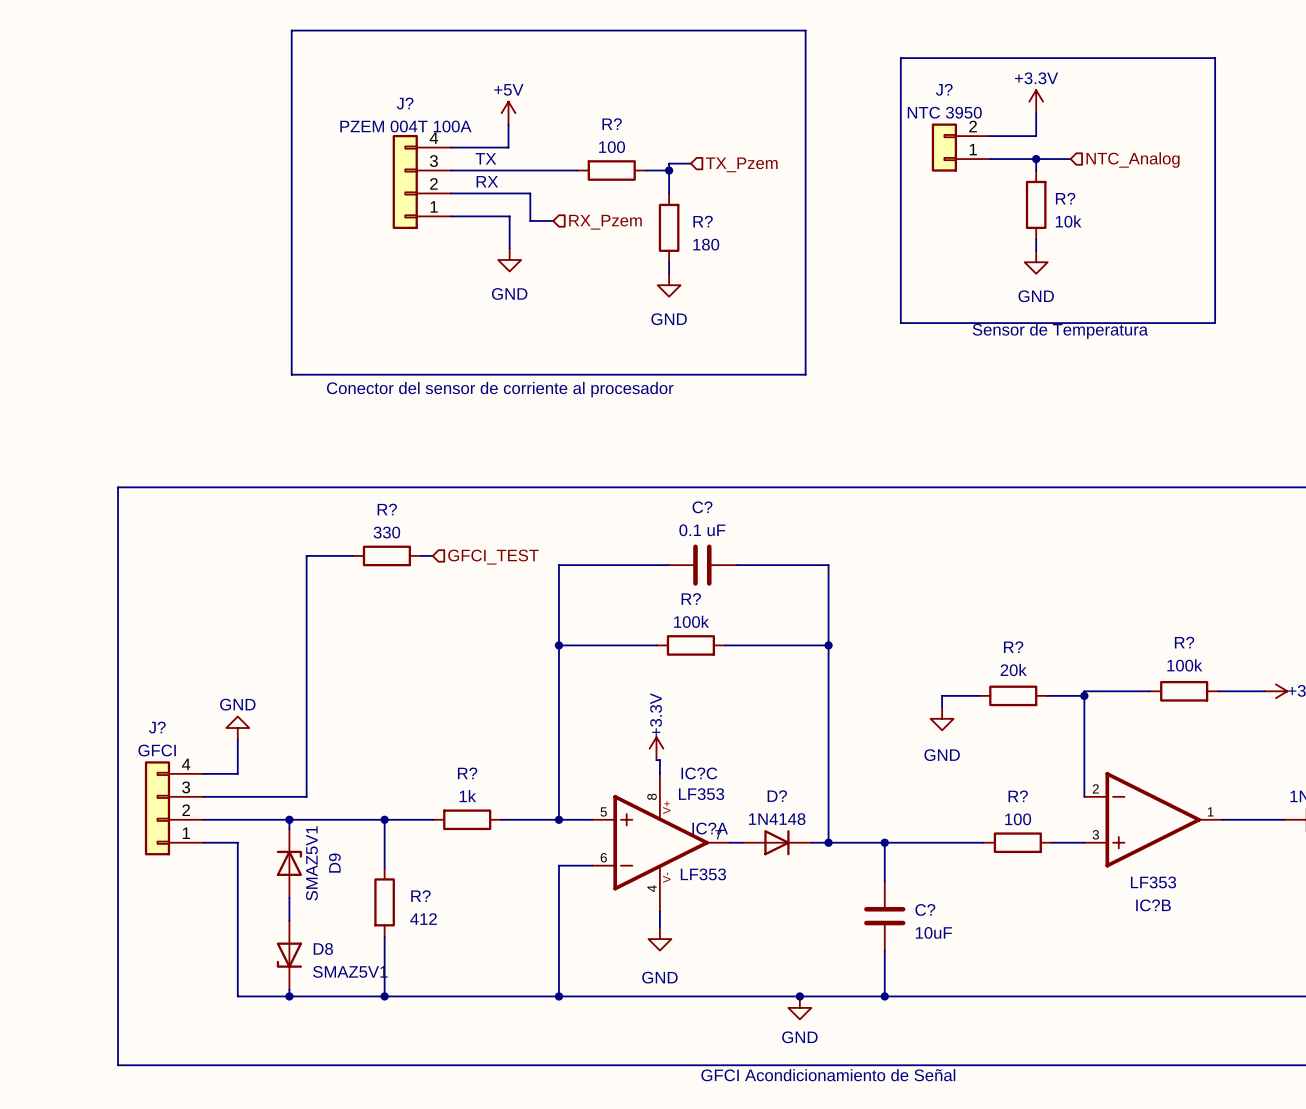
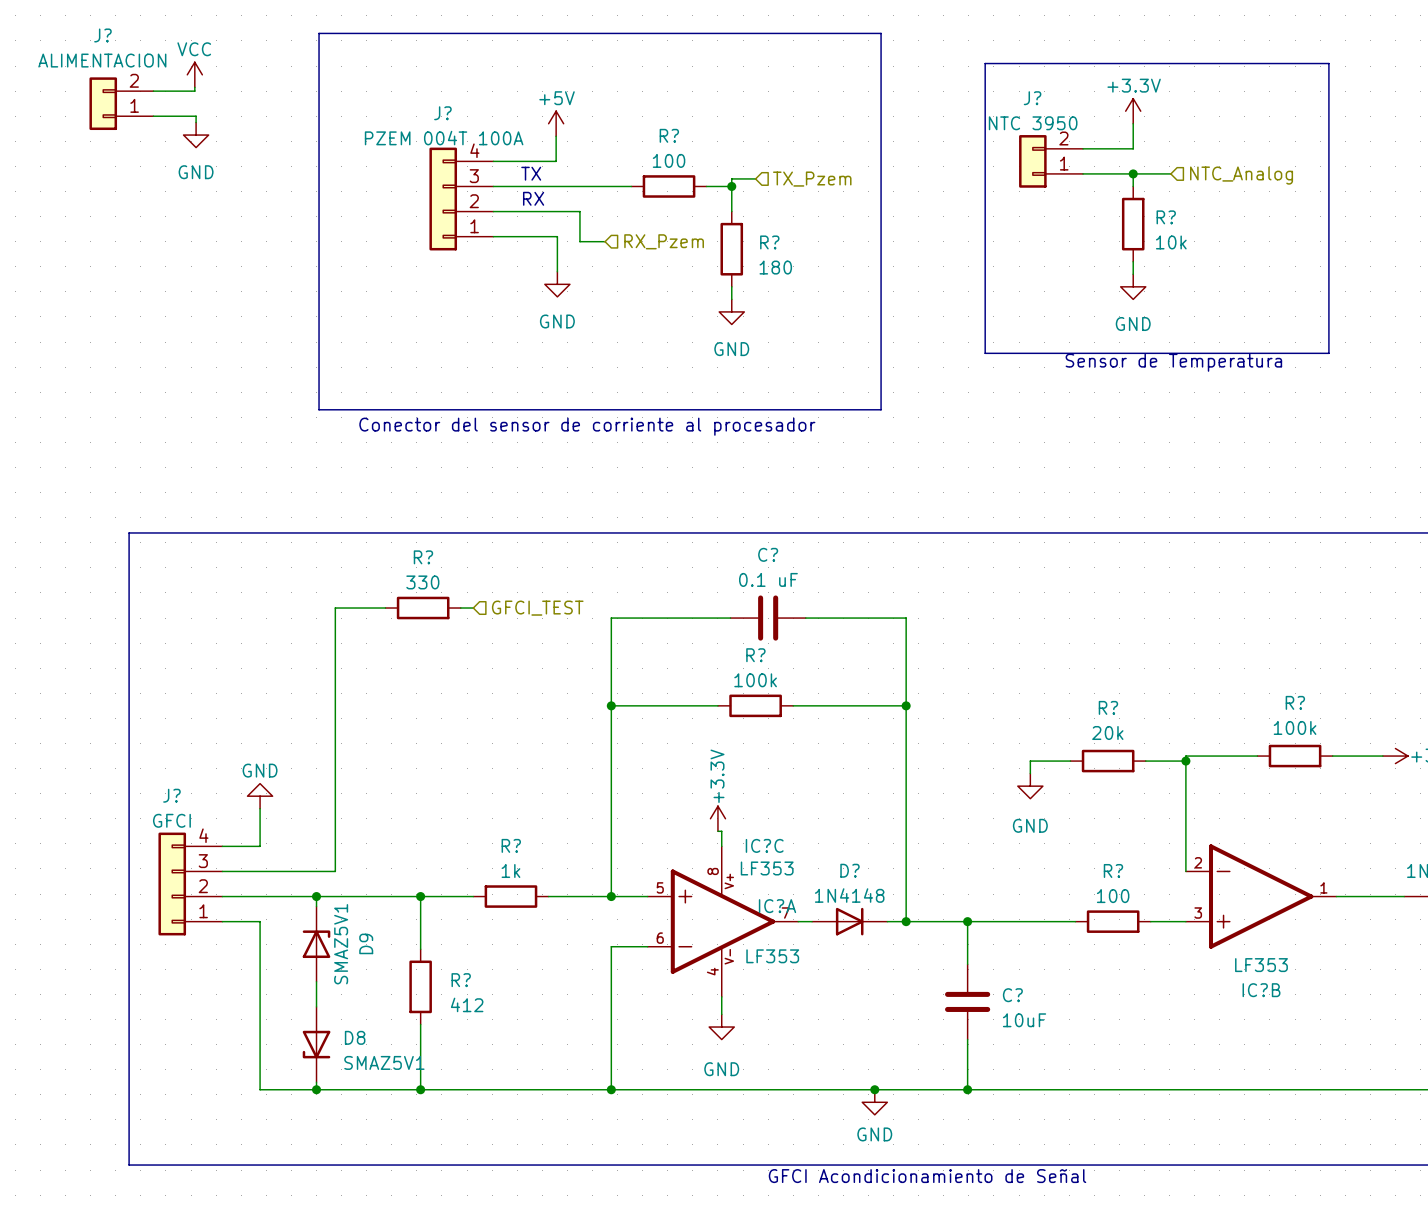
power symbol: none -> VCC (194, 74)
wire: none -> (194, 87) (194, 91) (153, 91)
J?: none -> ALIMENTACION (121, 103)
wire: none -> (153, 116) (196, 116) (196, 122)
power symbol: none -> GND (196, 135)

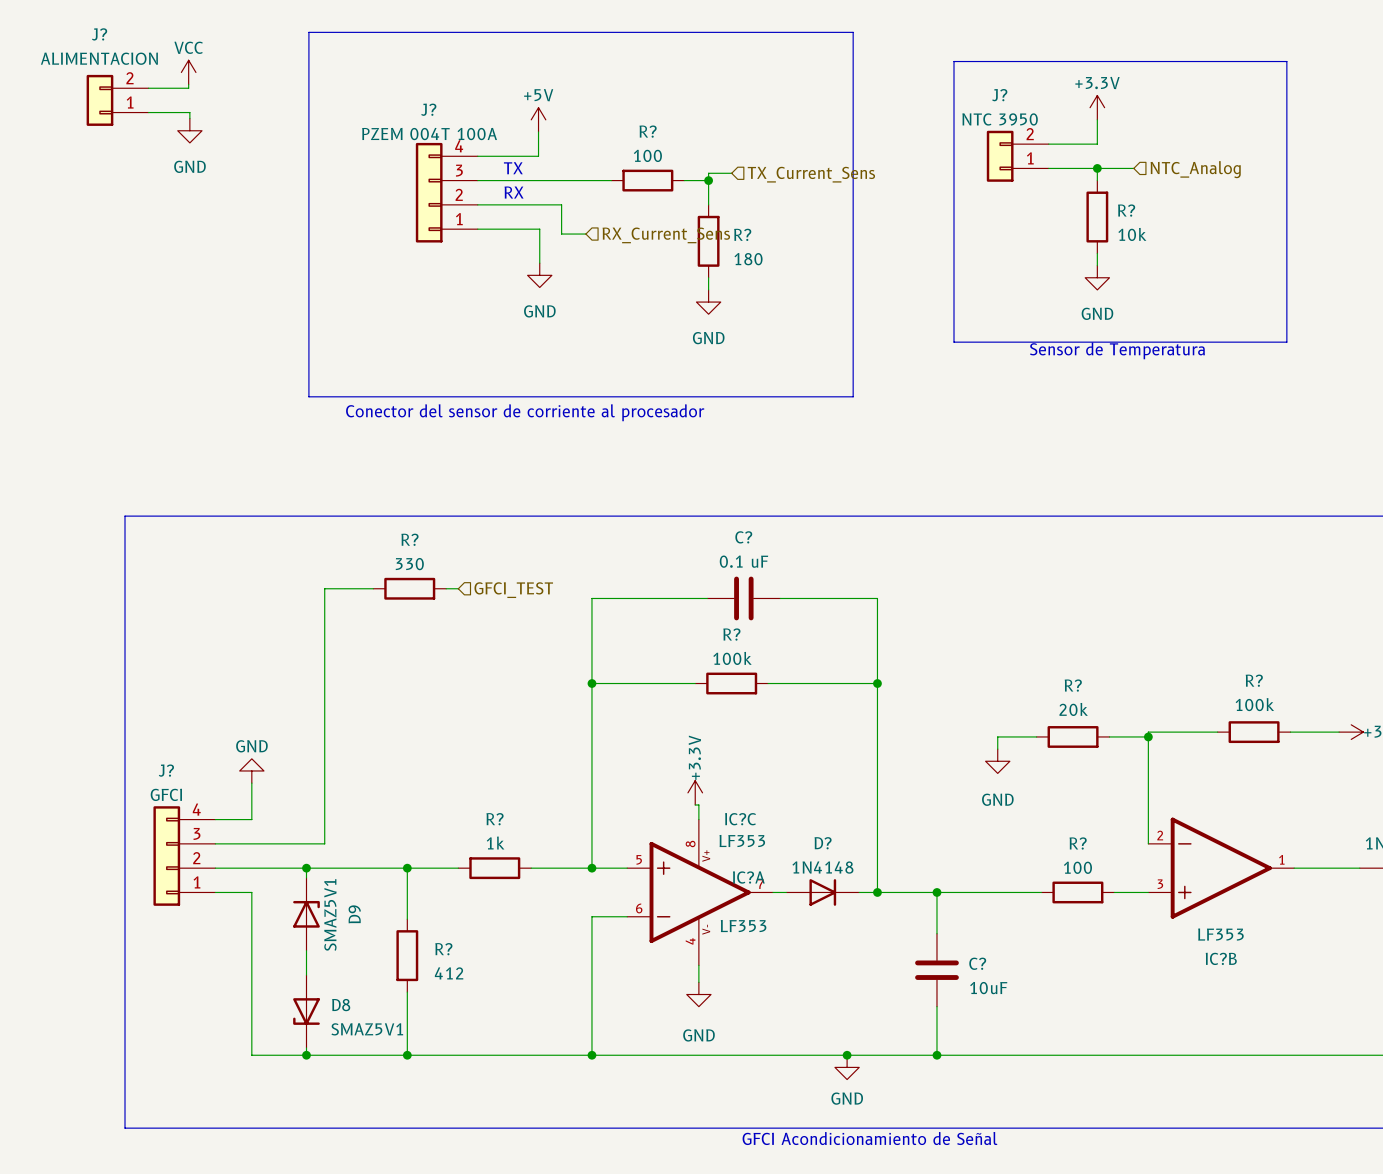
hierarchical label: TX_Pzem (812, 179) -> TX_Current_Sens (811, 174)
hierarchical label: RX_Pzem (664, 241) -> RX_Current_Sens (666, 235)

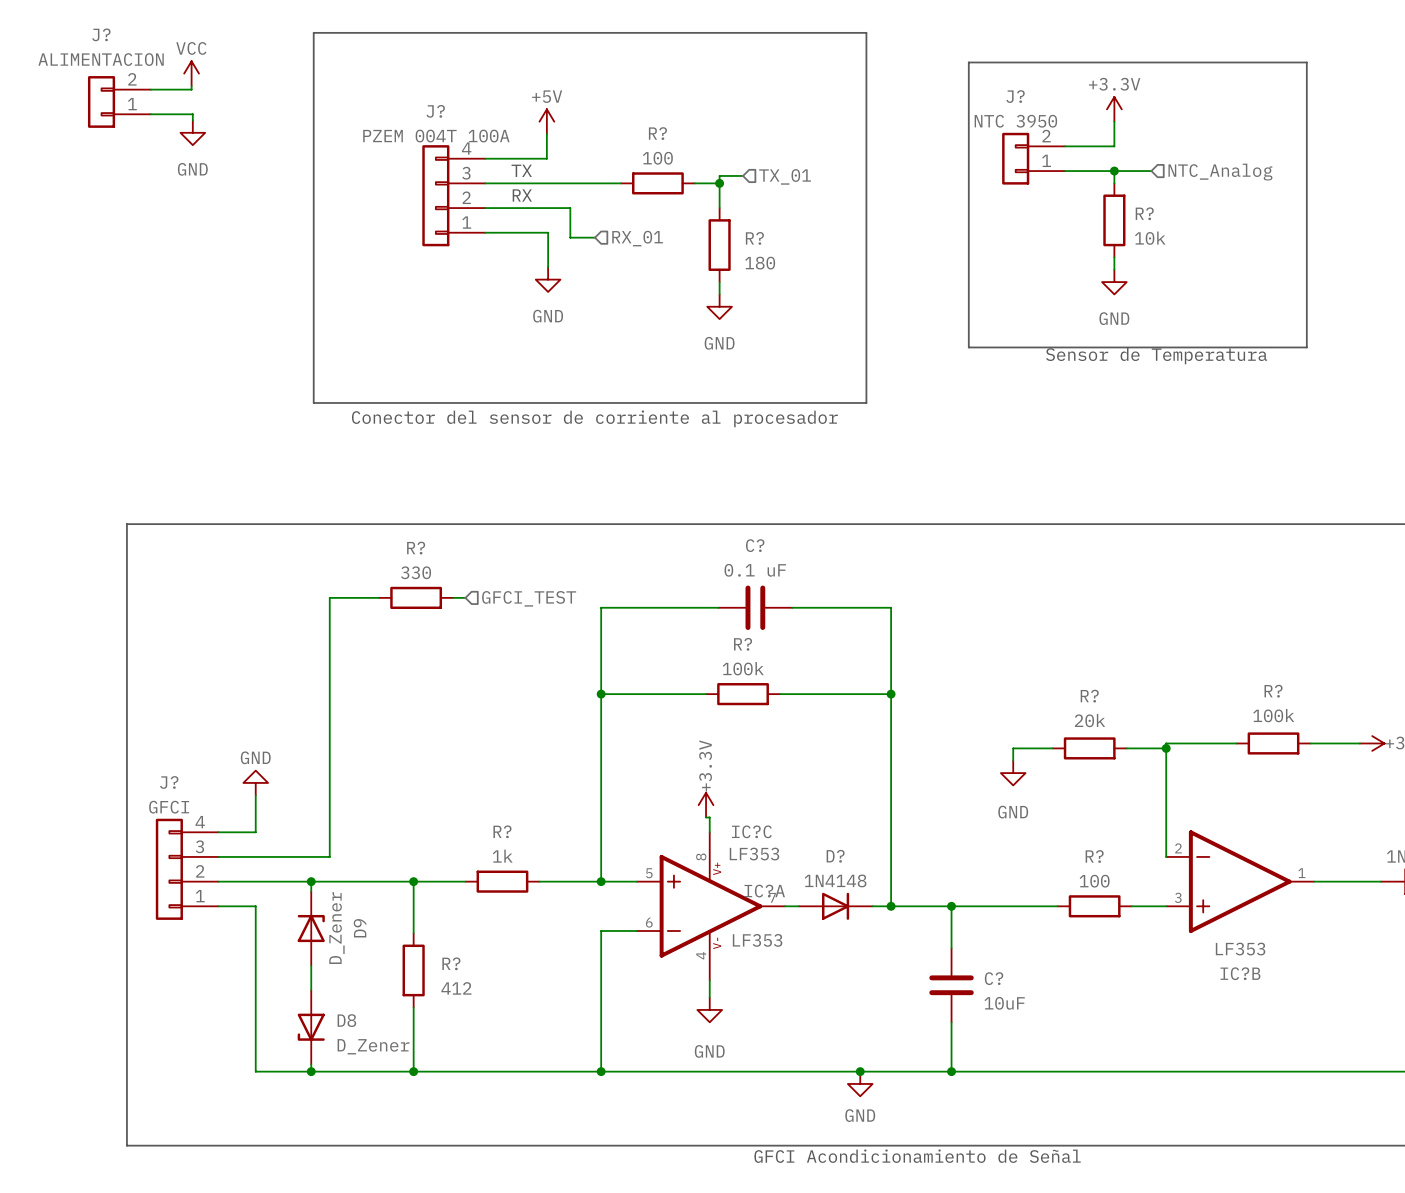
hierarchical label: TX_Current_Sens (811, 174) -> TX_01 (785, 176)
hierarchical label: RX_Current_Sens (666, 235) -> RX_01 (637, 238)
D9 value: SMAZ5V1 (330, 915) -> D_Zener (336, 928)
D8 value: SMAZ5V1 (367, 1029) -> D_Zener (373, 1046)

